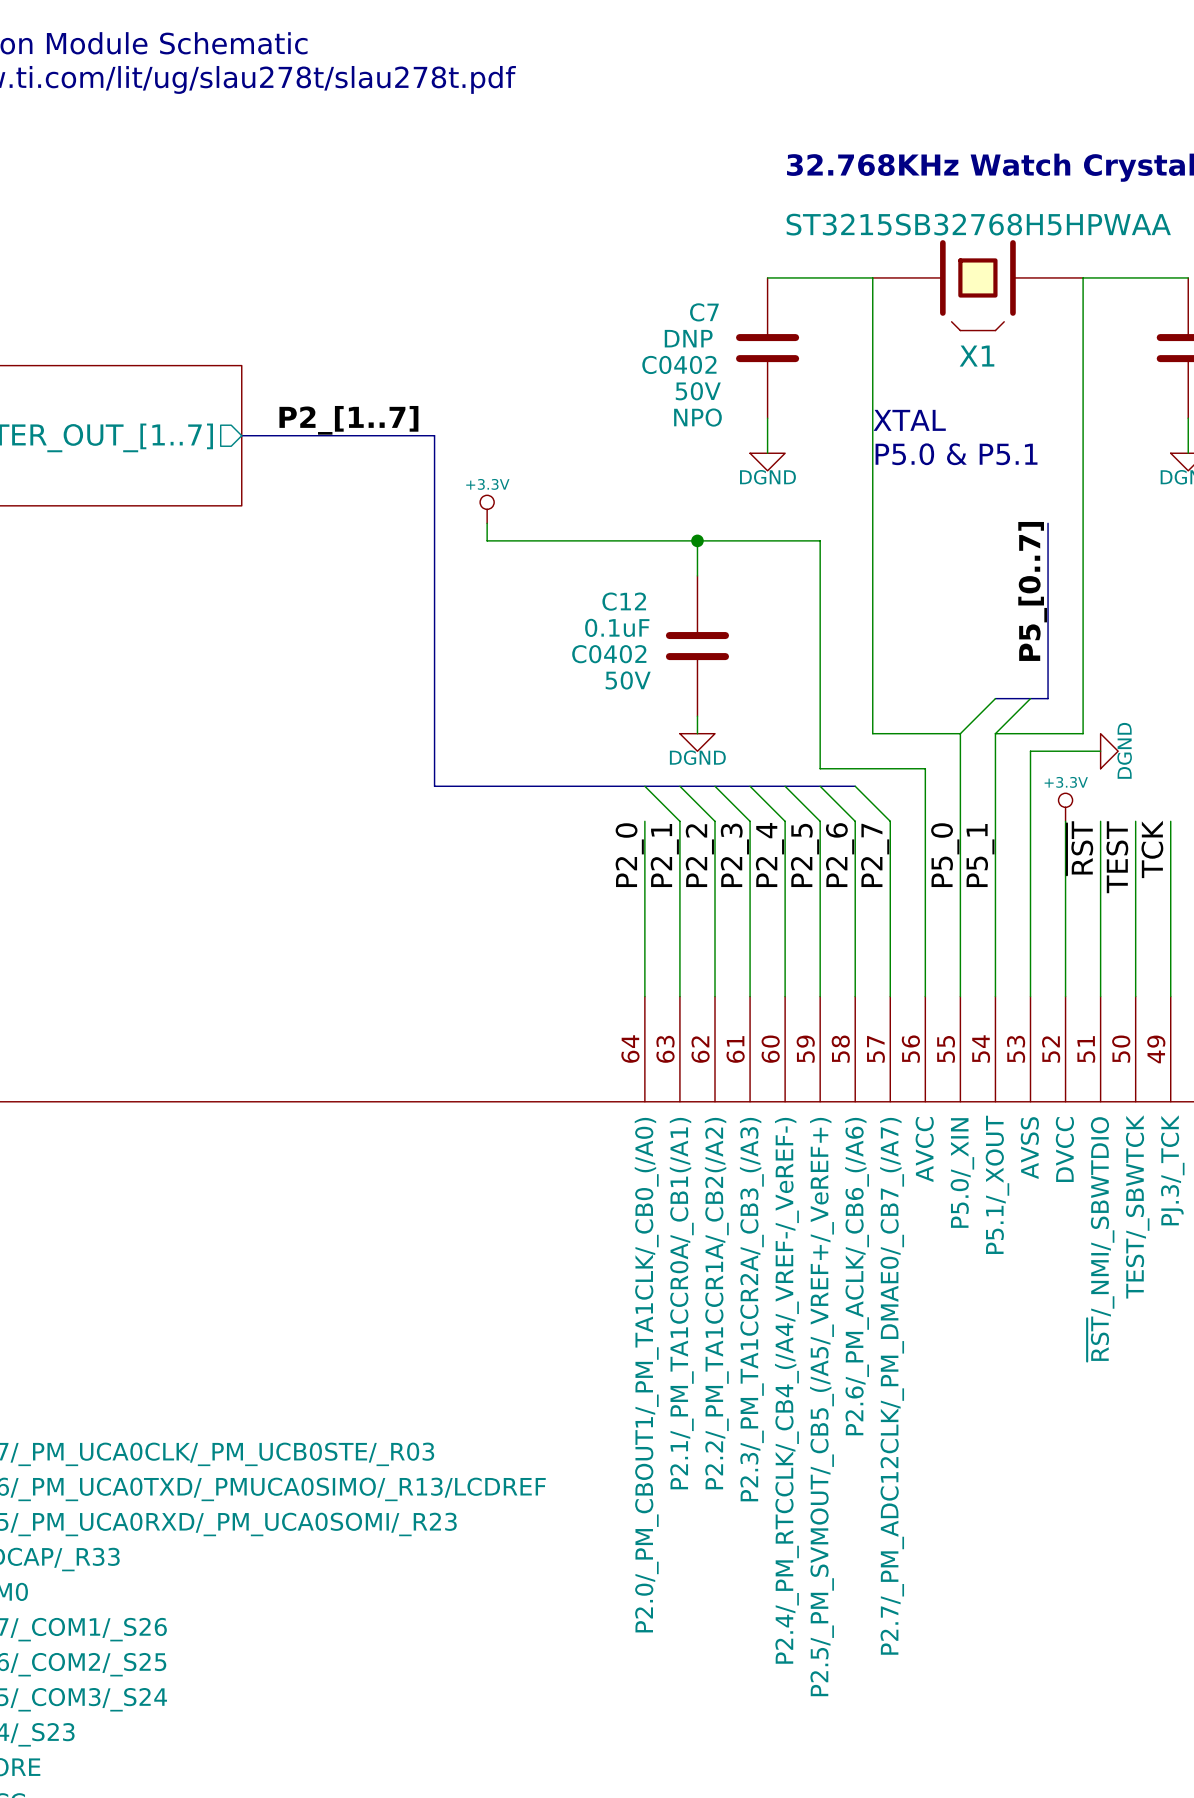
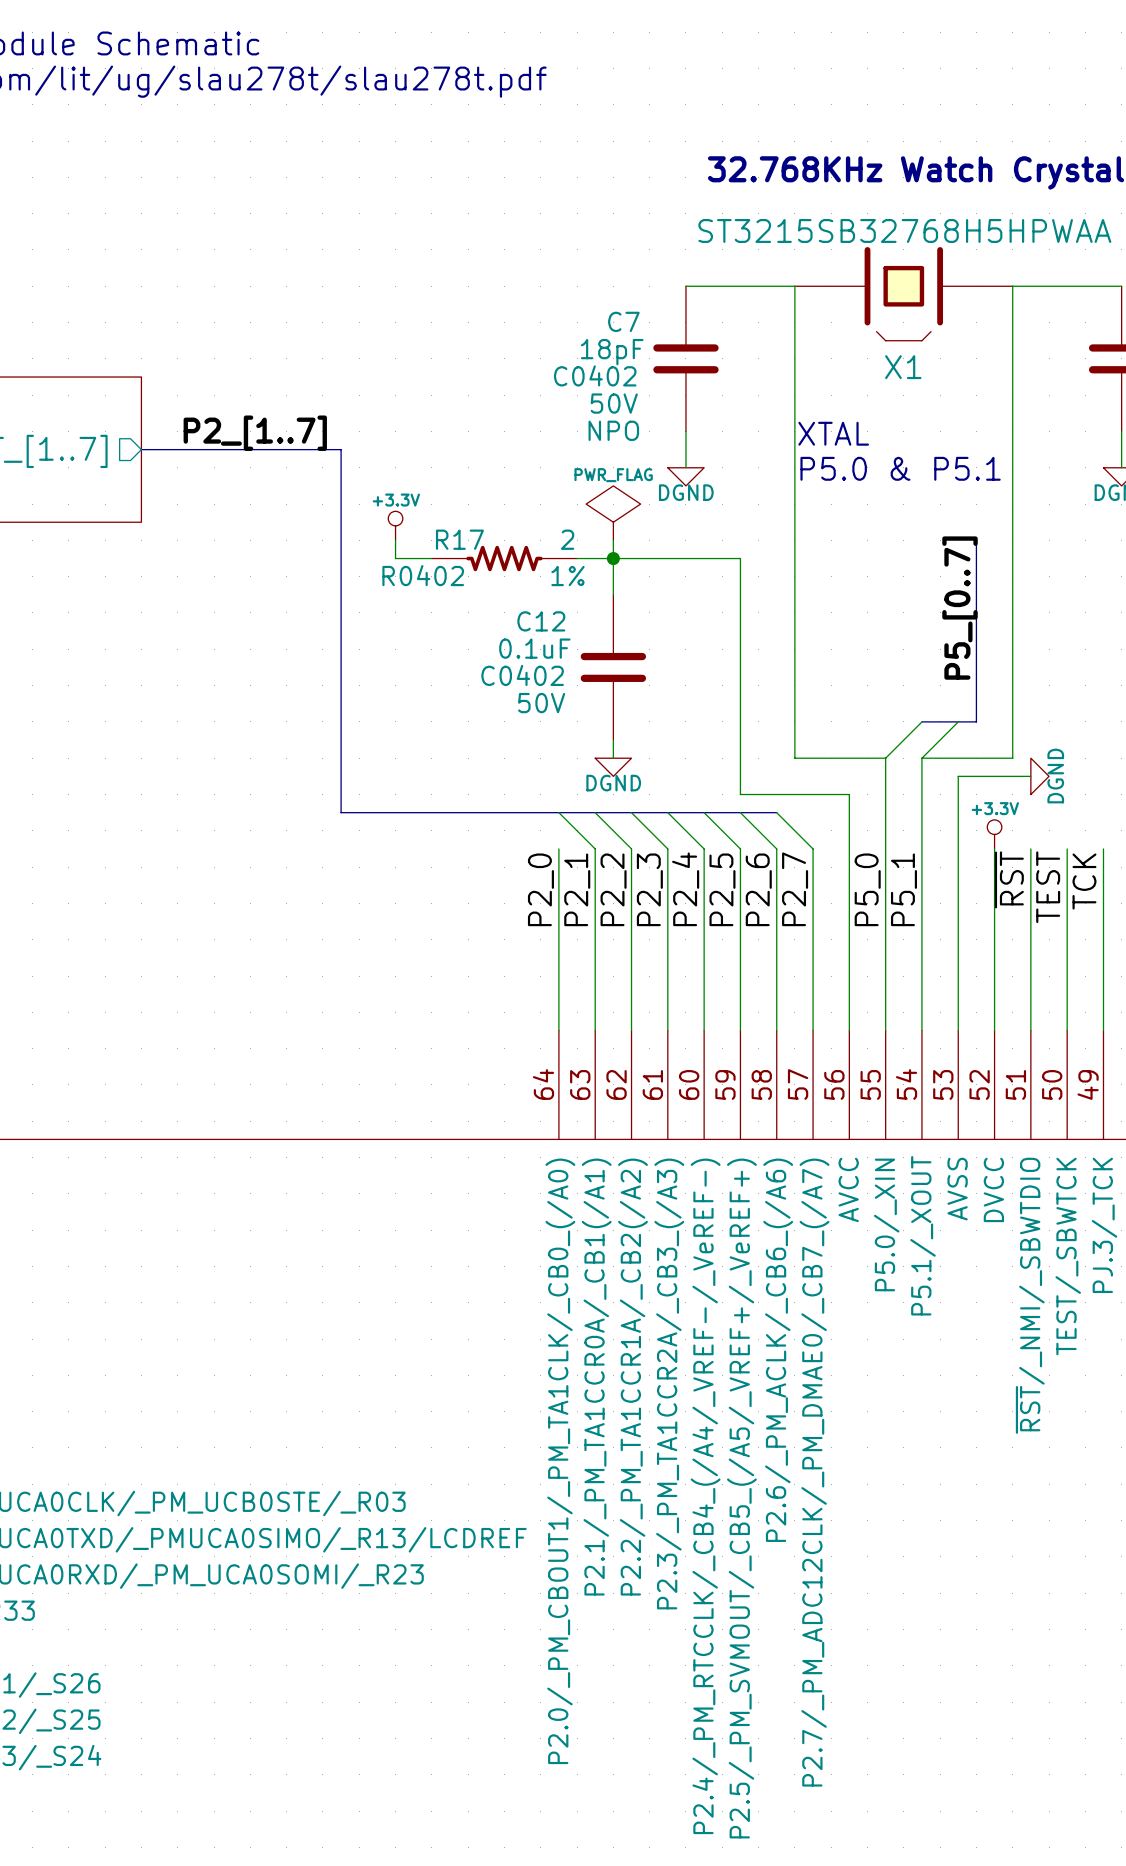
C7 value: DNP (688, 338) -> 18pF (612, 352)
power symbol: none -> PWR_FLAG (613, 513)
wire: none -> (613, 540) (613, 558)
R17: none -> 2 (504, 558)

